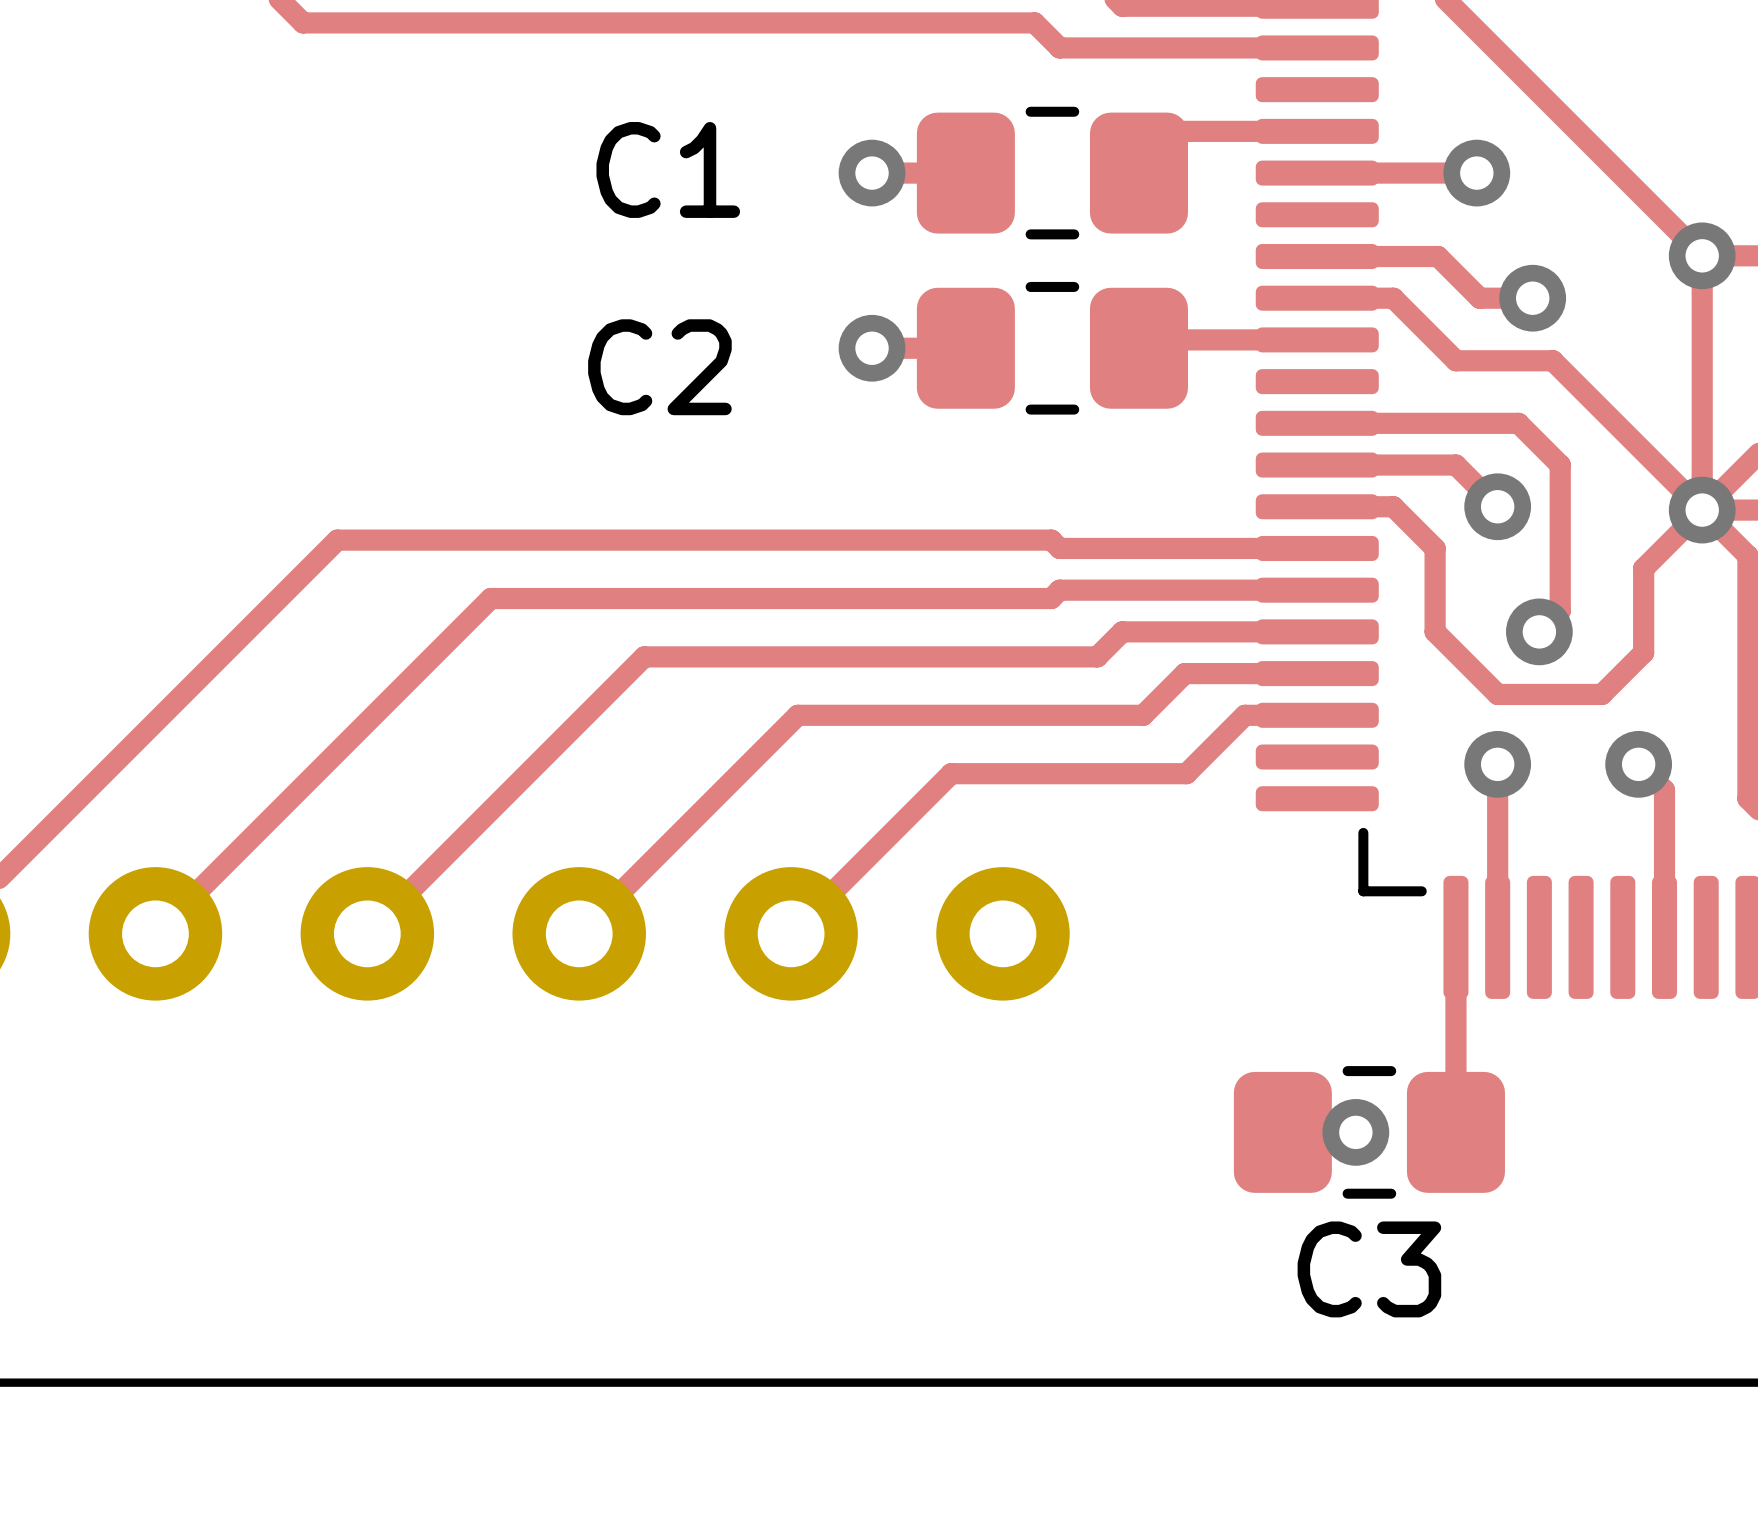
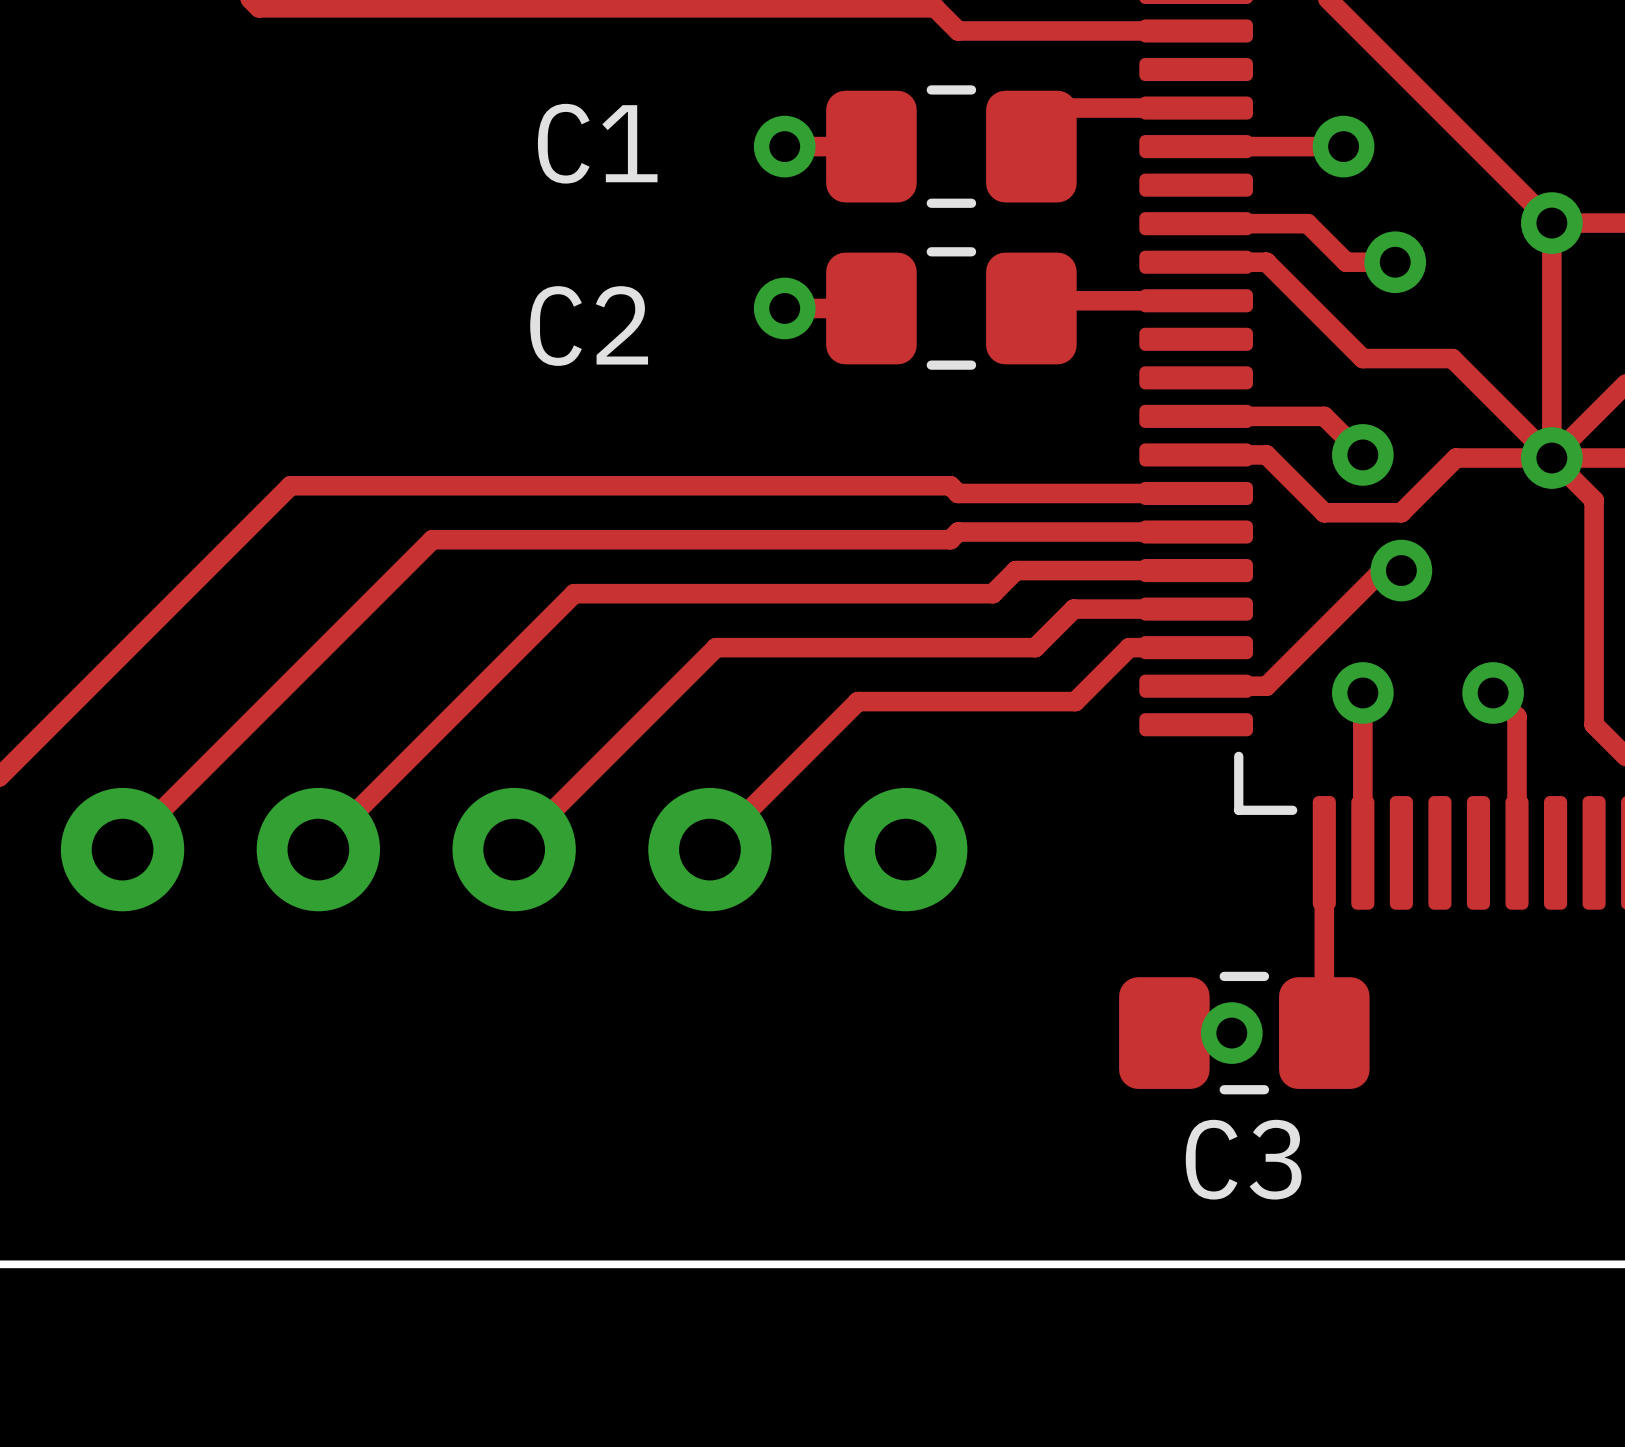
track: (1455, 360) (1552, 360) (1594, 402) -> (1324, 320) (1362, 358) (1452, 358)
track: (1317, 423) (1518, 423) (1560, 465) (1560, 611) (1539, 631) -> (1196, 686) (1266, 686) (1382, 570) (1401, 570)
track: (1702, 510) (1643, 568) (1643, 652) (1601, 694) (1497, 694) (1435, 631) (1435, 548) -> (1551, 458) (1456, 458) (1401, 512) (1324, 512) (1305, 493)

